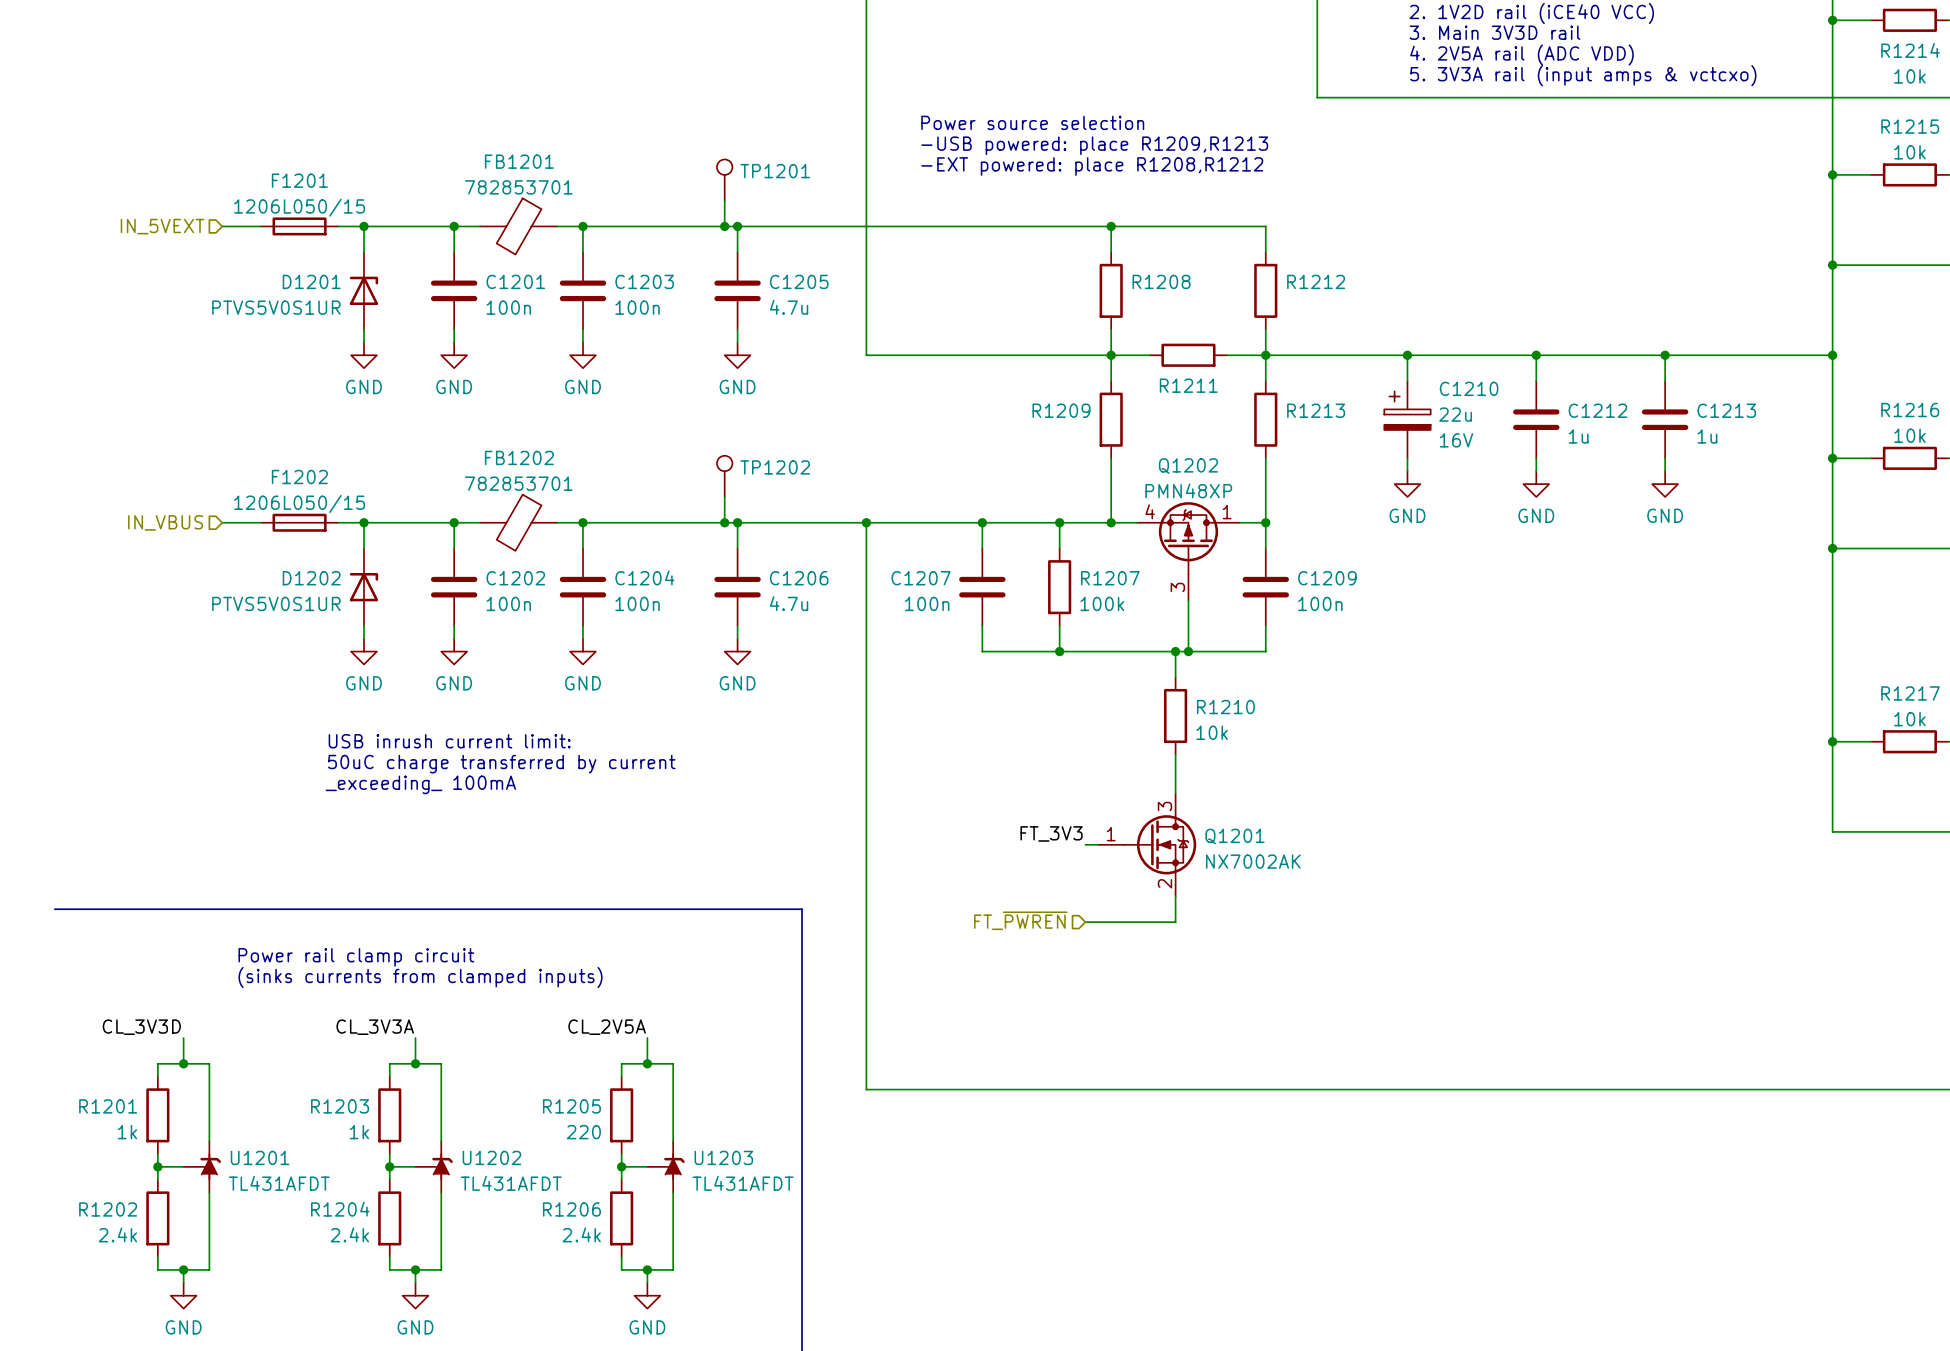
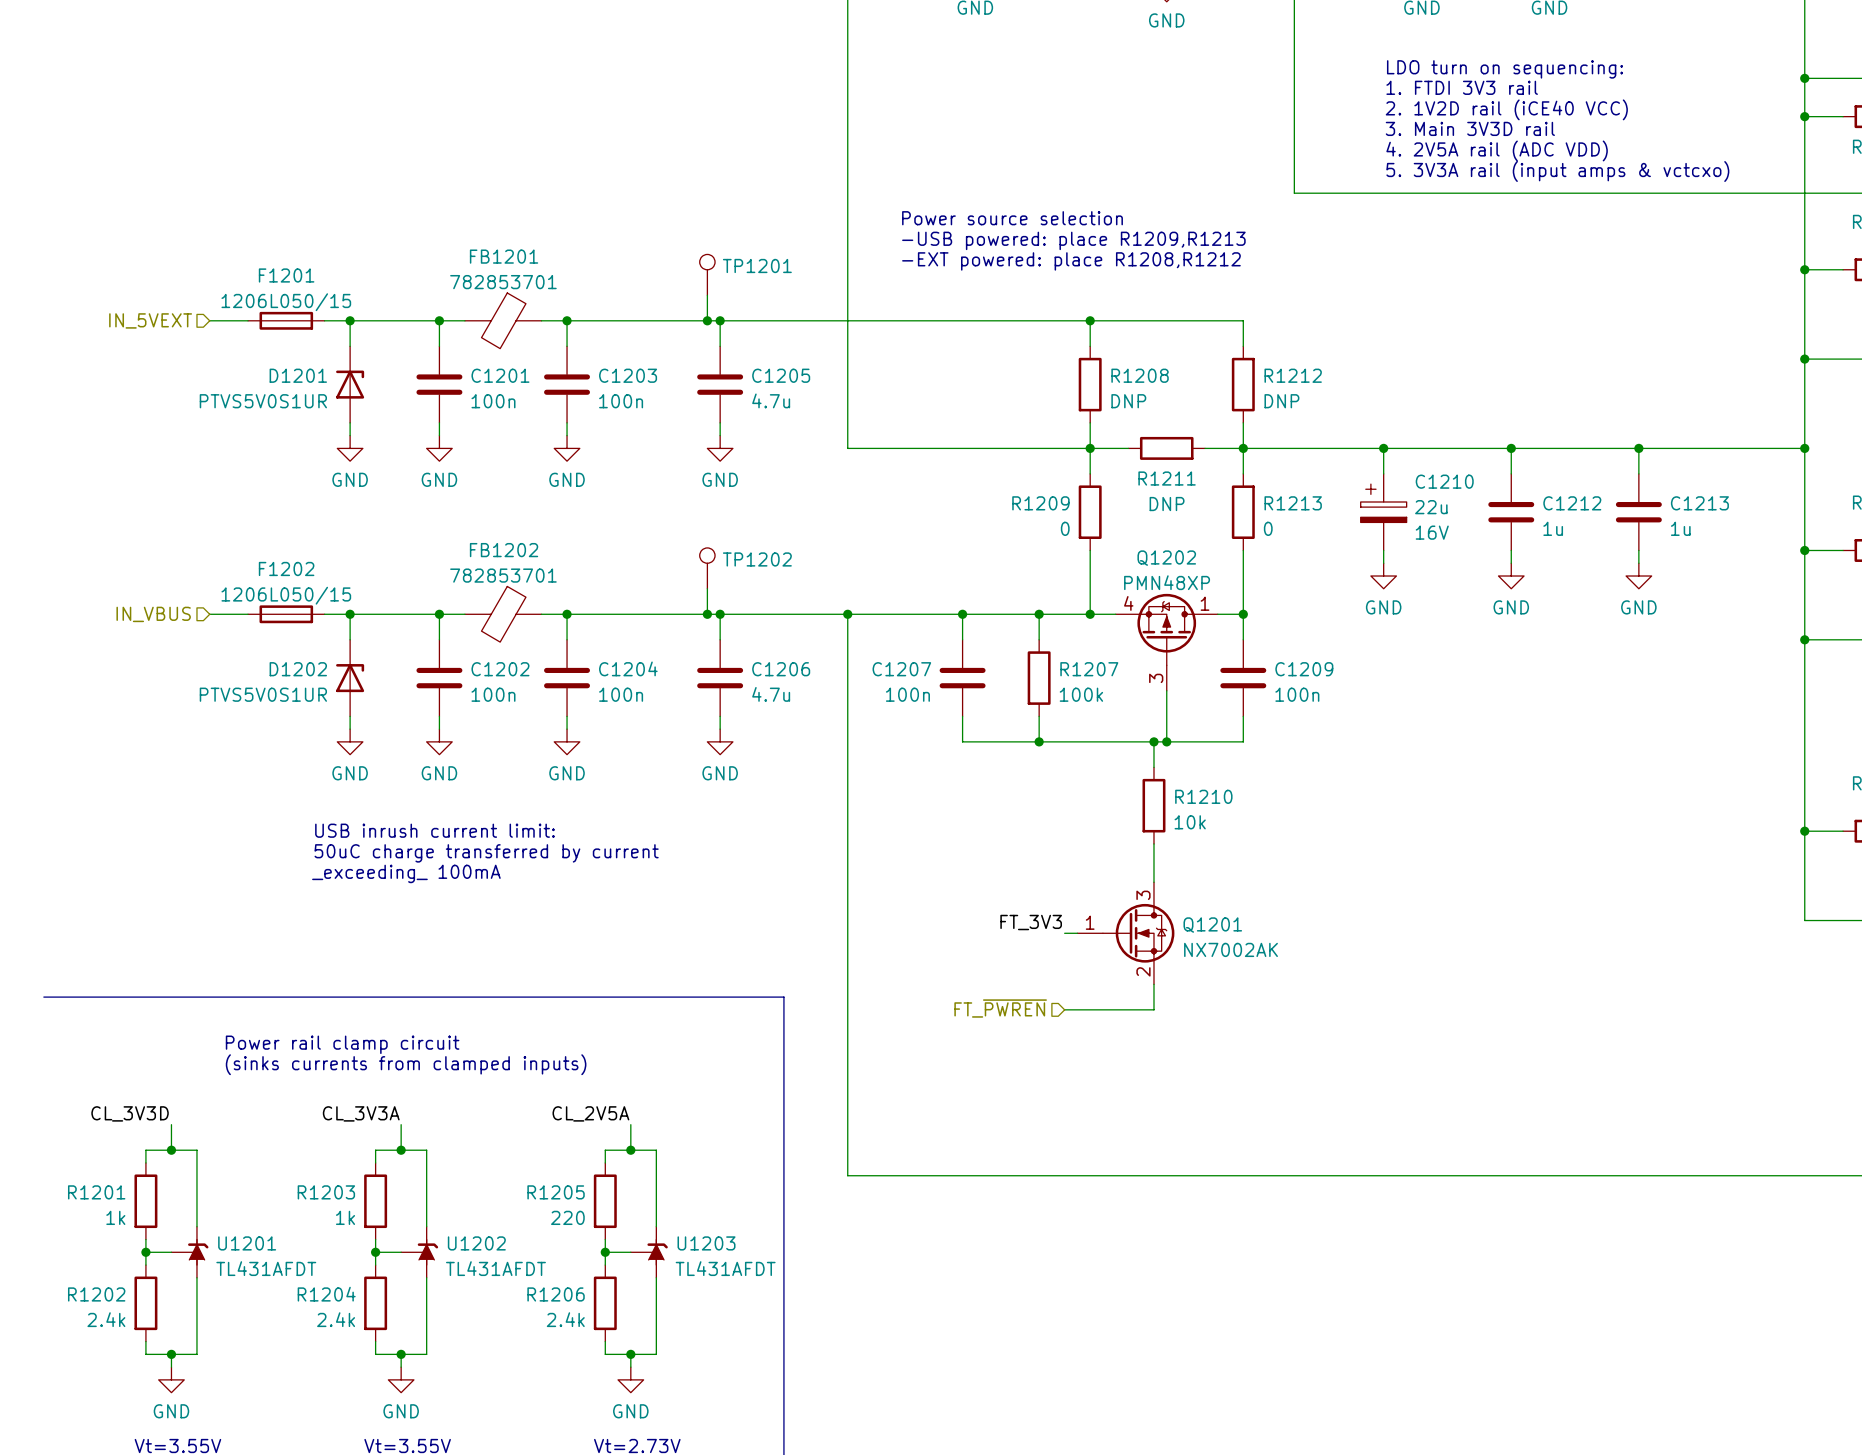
R1208 value: none -> DNP (1128, 401)
R1212 value: none -> DNP (1281, 401)
R1211 value: none -> DNP (1167, 504)
R1209 value: none -> 0 (1065, 528)
R1213 value: none -> 0 (1268, 528)

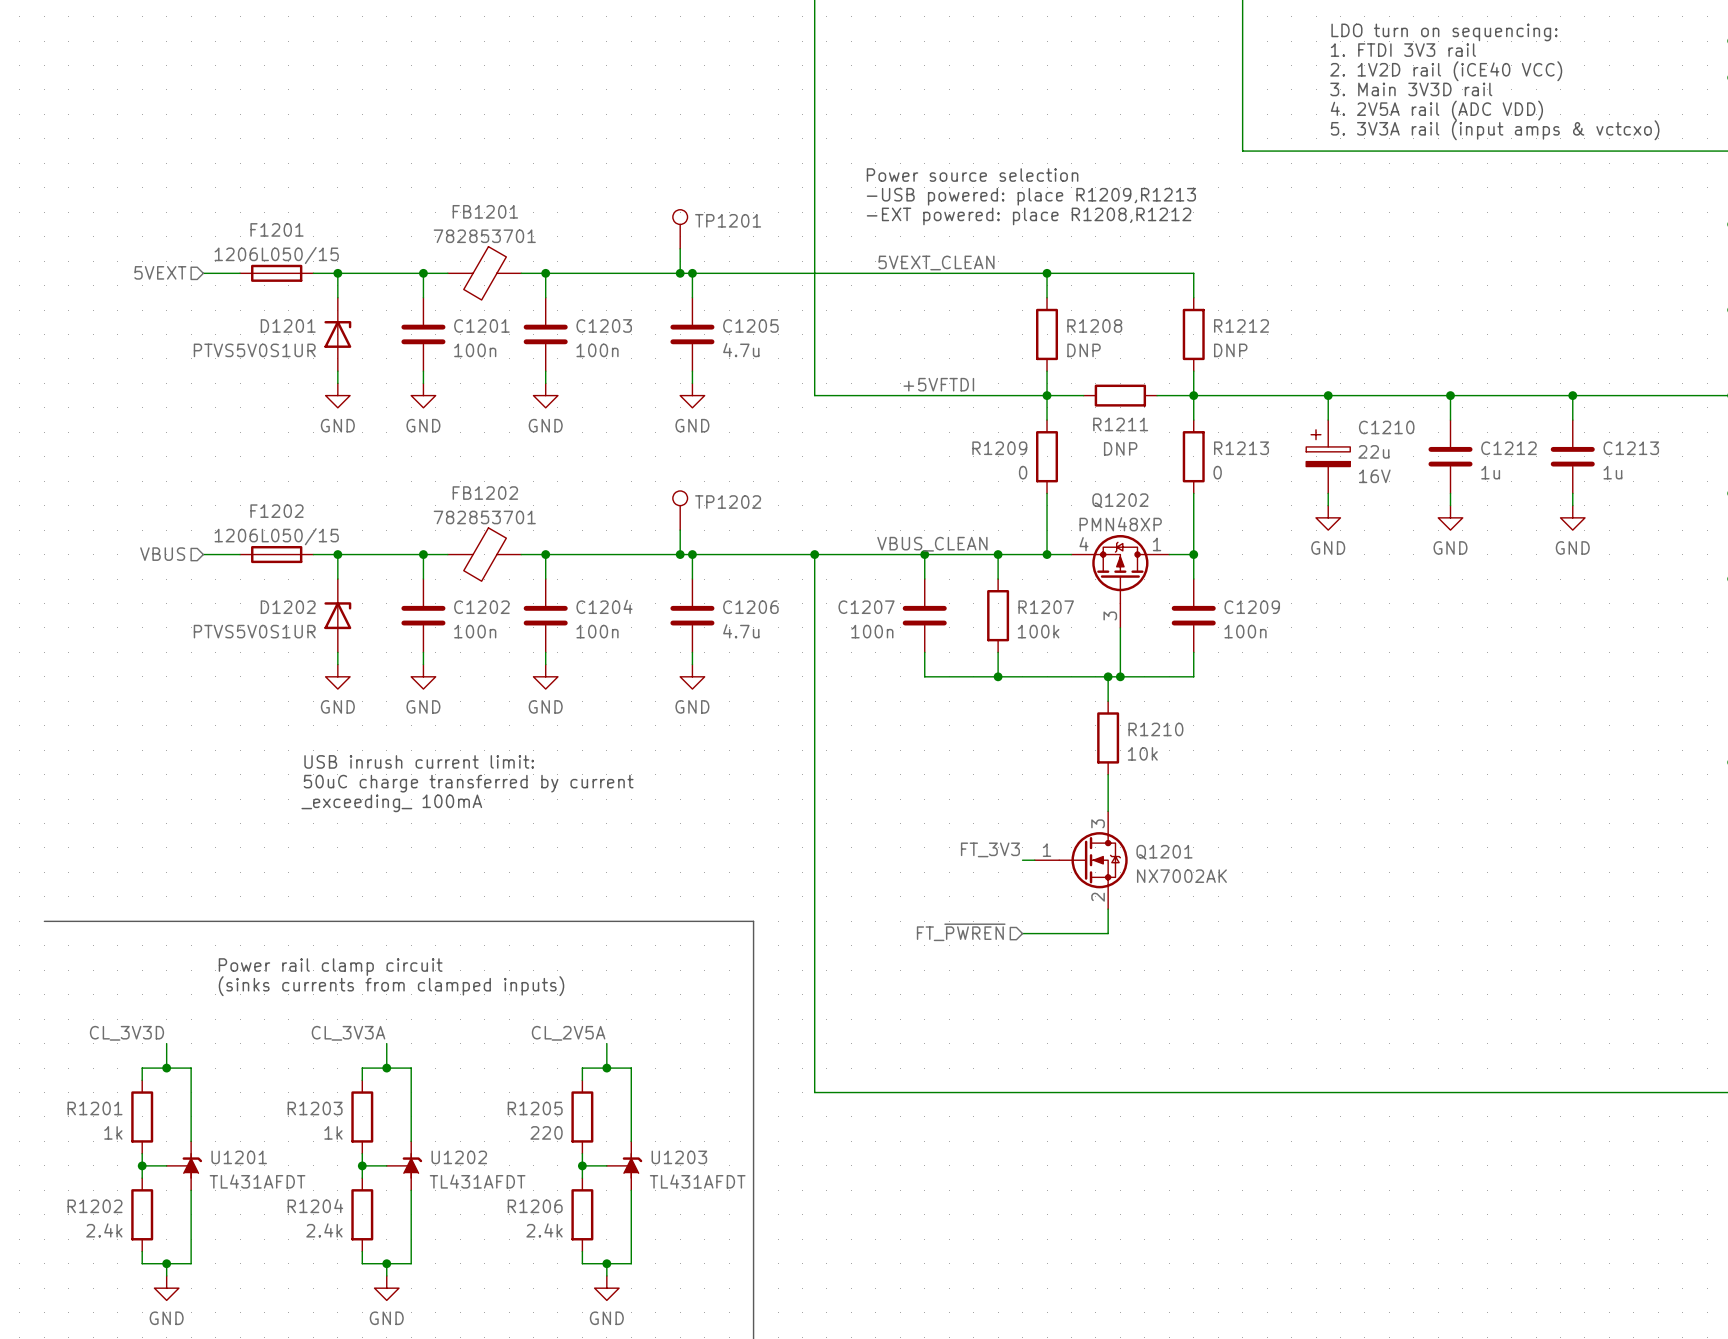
label: none -> 5VEXT_CLEAN (936, 263)
hierarchical label: IN_5VEXT (150, 320) -> 5VEXT (160, 272)
label: none -> +5VFTDI (938, 384)
label: none -> VBUS_CLEAN (932, 544)
hierarchical label: IN_VBUS (153, 614) -> VBUS (162, 554)

